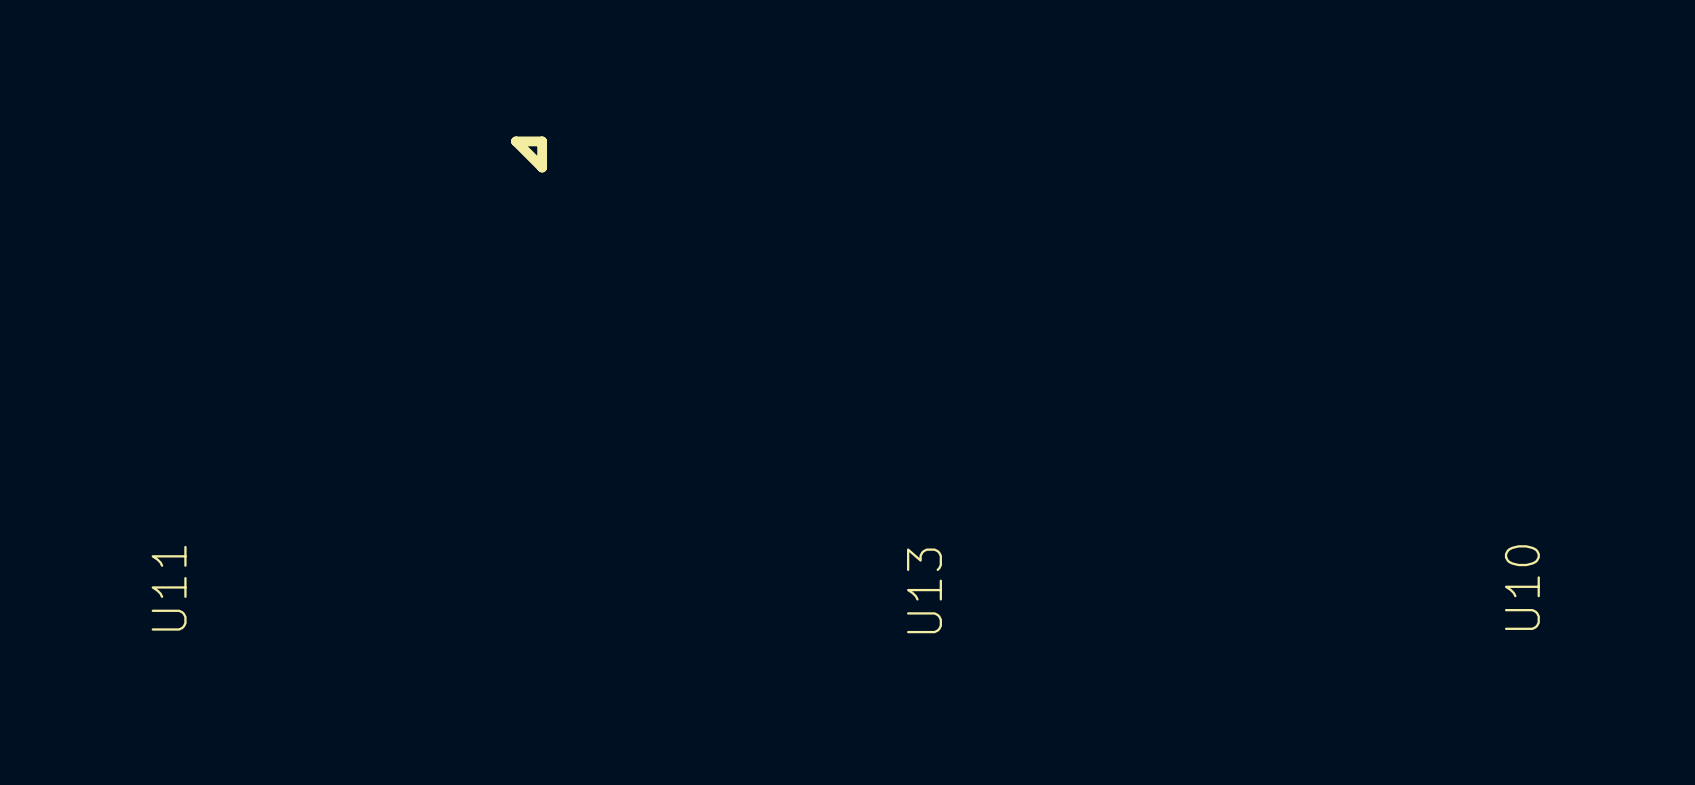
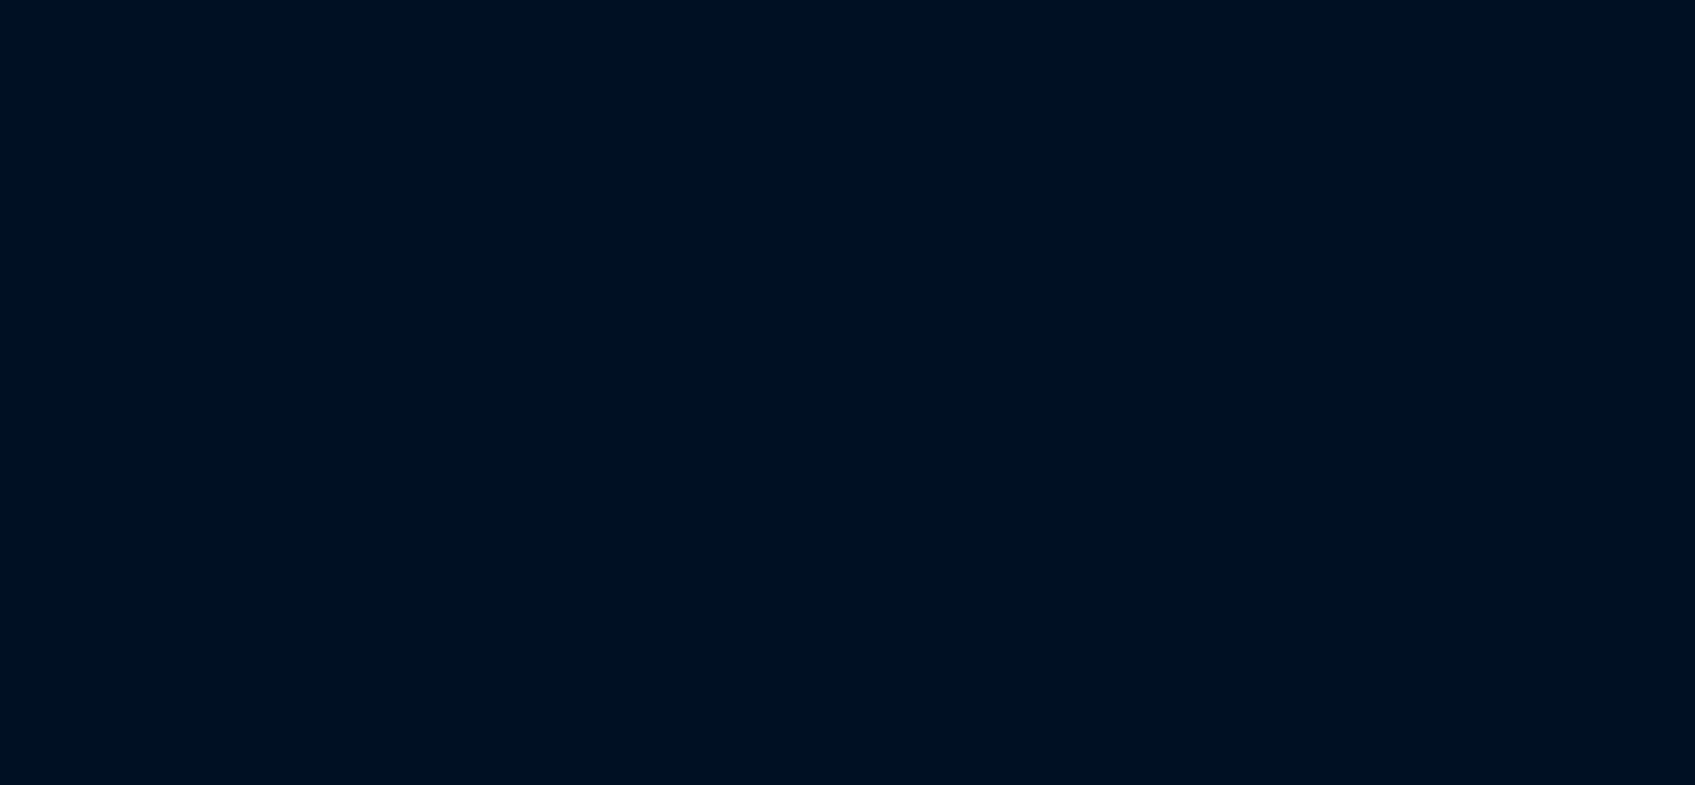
line: (516, 141) (542, 141) (542, 167) (516, 141) -> none
text: U10 (1522, 587) -> none
text: U11 (169, 588) -> none
text: U13 (924, 590) -> none

